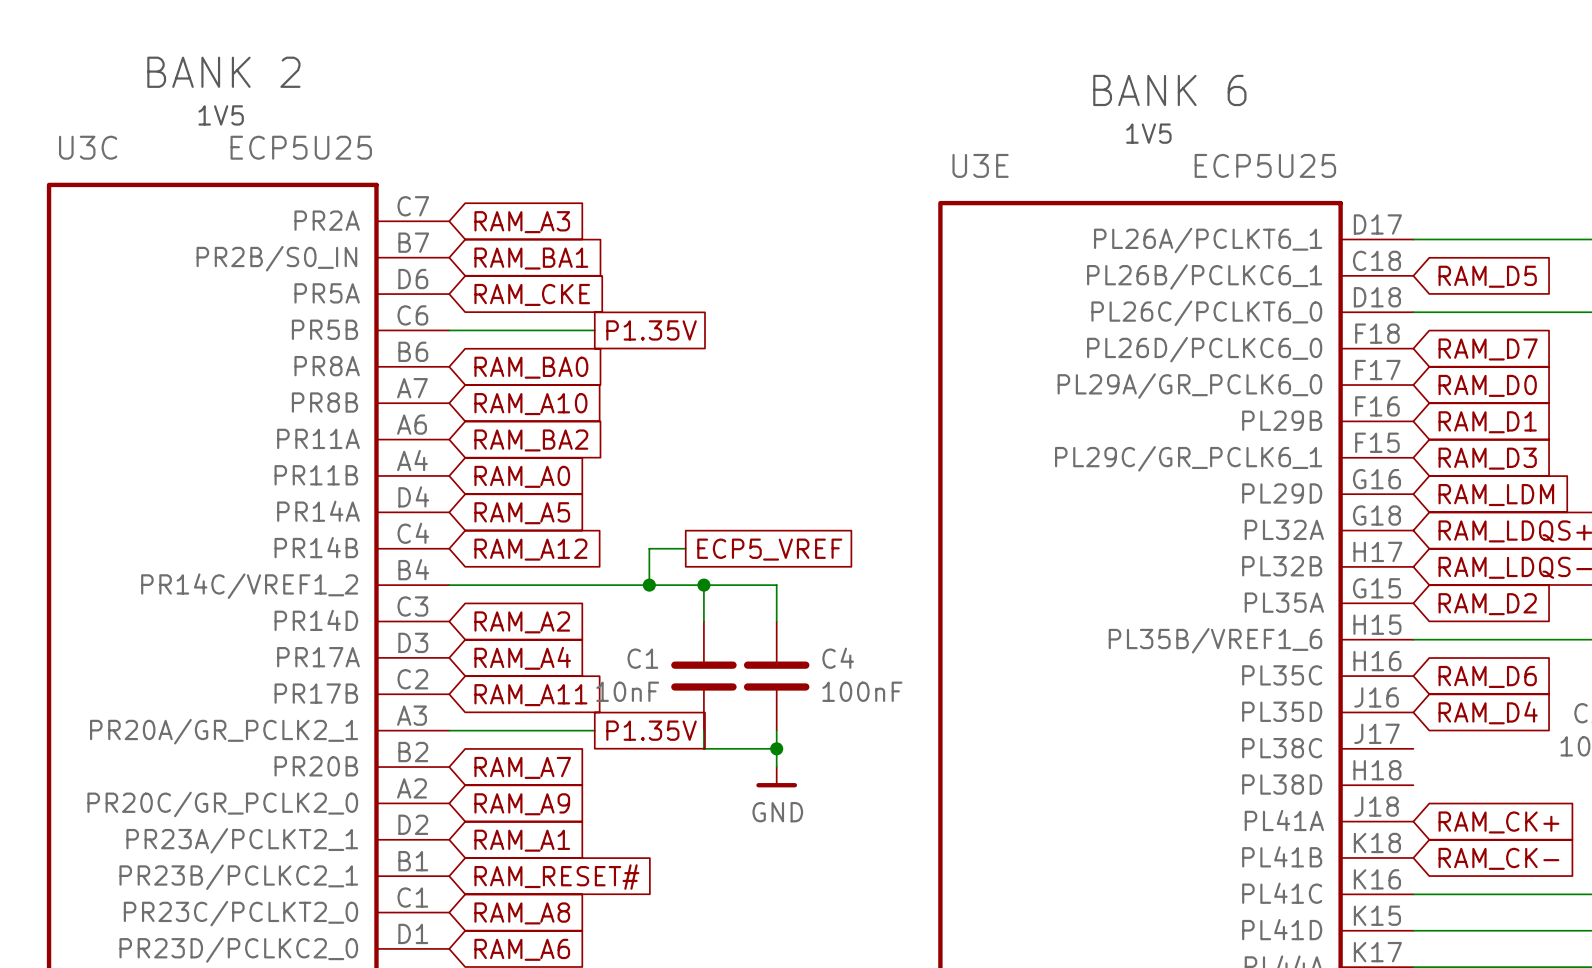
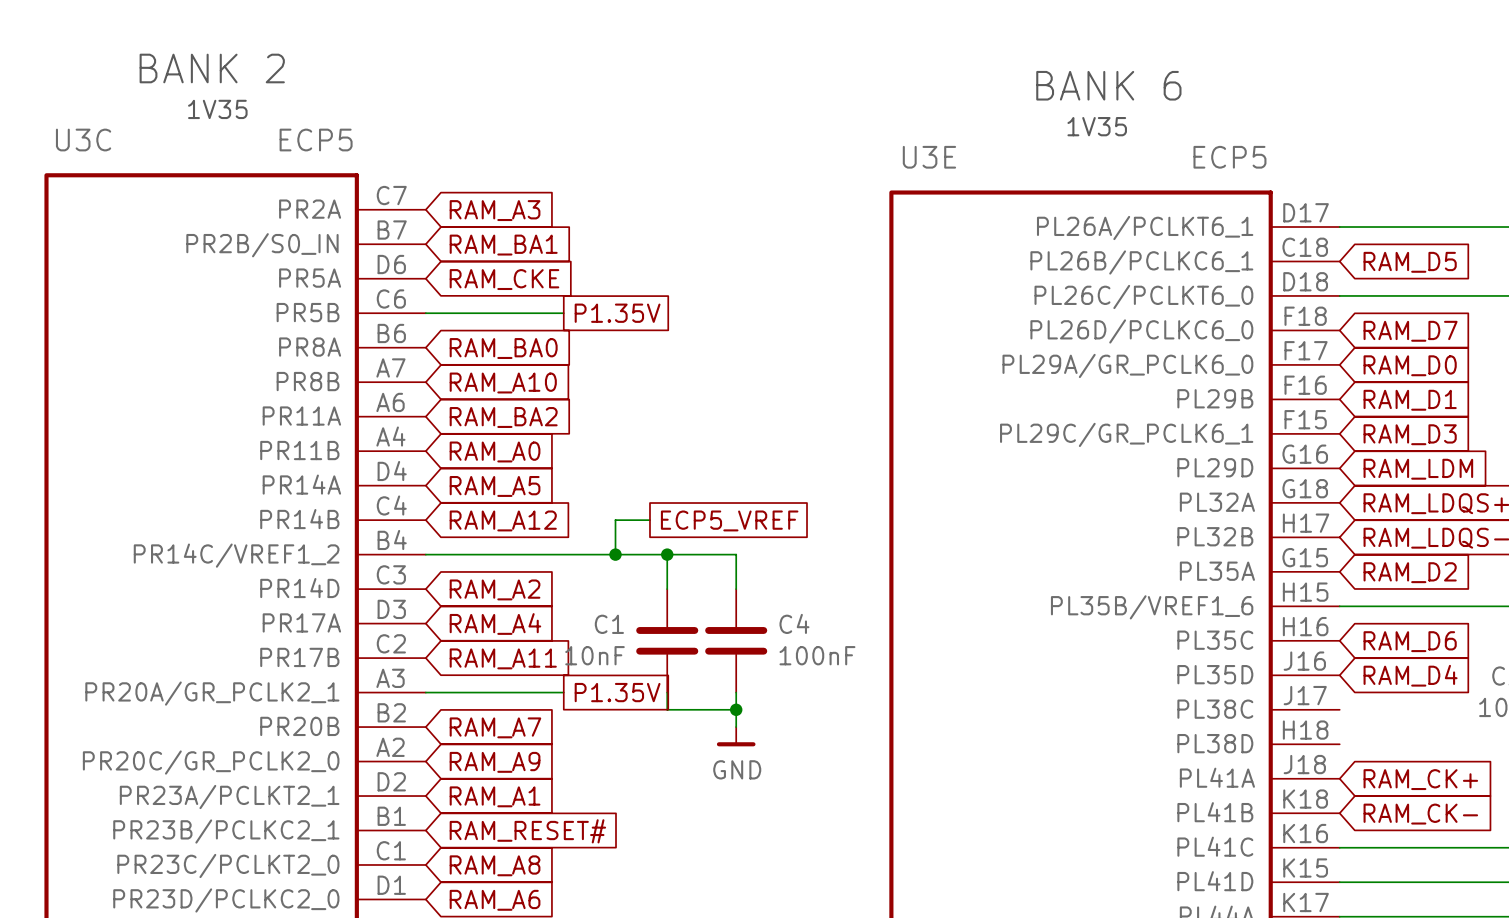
text: 1V5 (221, 115) -> 1V35 (217, 109)
text: 1V5 (1148, 133) -> 1V35 (1097, 126)
U3C value: ECP5U25 (301, 147) -> ECP5 (316, 140)
U3E value: ECP5U25 (1265, 165) -> ECP5 (1229, 157)

